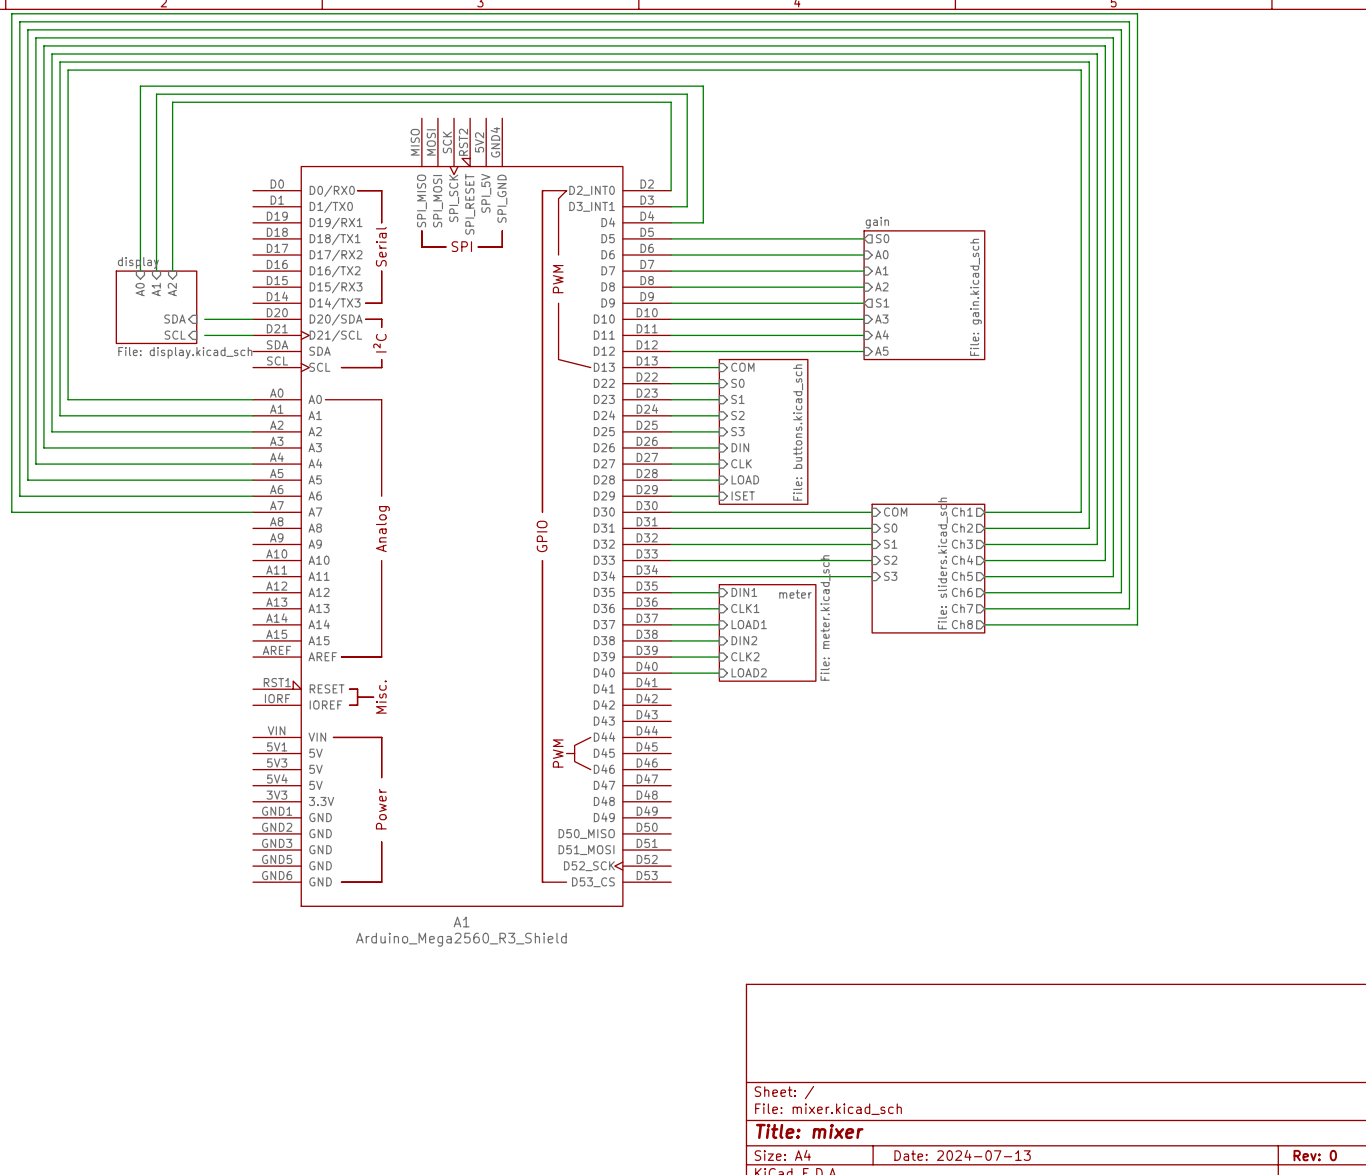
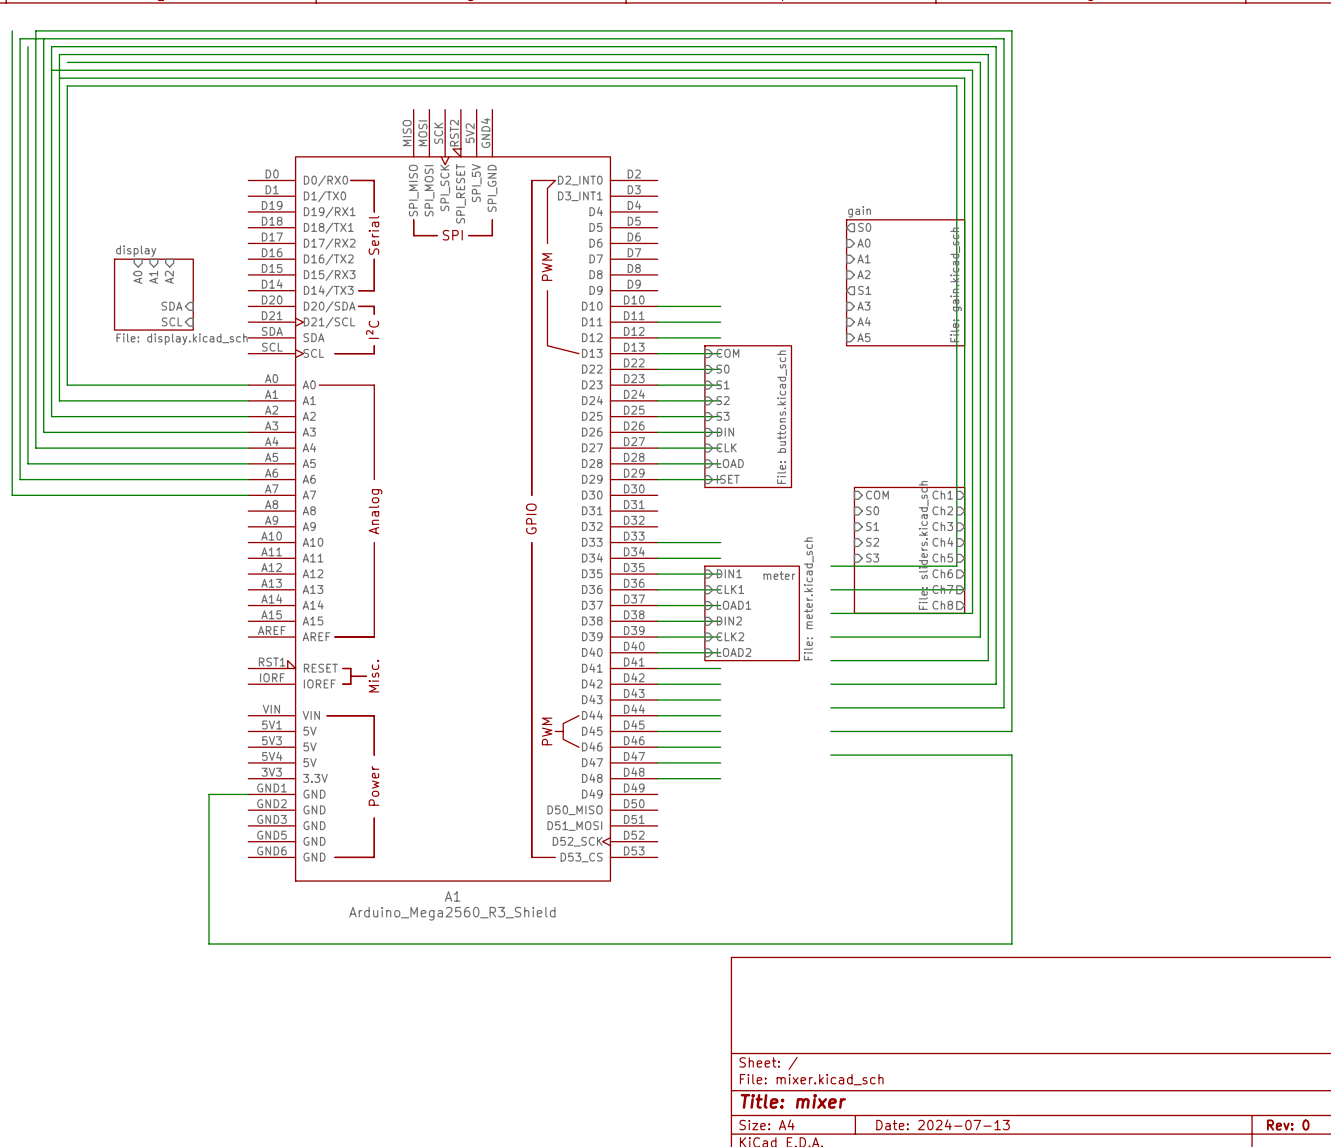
wire: (11, 37) (11, 13) (1137, 13) (1137, 624) (984, 624) -> none
wire: (1032, 37) (1113, 37) (1113, 576) (984, 576) -> (1011, 30) (1011, 731) (830, 731)
wire: (19, 45) (19, 21) (1129, 21) (1129, 608) (984, 608) -> (20, 38) (43, 38)
wire: (1024, 45) (1105, 45) (1105, 560) (984, 560) -> (1004, 38) (1004, 707) (830, 707)
wire: (27, 53) (27, 29) (1121, 29) (1121, 592) (984, 592) -> none
wire: (1016, 53) (1097, 53) (1097, 544) (984, 544) -> (996, 46) (996, 684) (830, 684)
wire: (1008, 62) (1089, 62) (1089, 528) (984, 528) -> (988, 54) (988, 660) (830, 660)
wire: (68, 70) (68, 94) -> (153, 86) (67, 86)
wire: (1000, 70) (1081, 70) (1081, 512) (984, 512) -> (980, 62) (980, 637) (830, 637)
wire: none -> (51, 70) (972, 70) (972, 613) (830, 613)
wire: (140, 86) (140, 271) -> (138, 78) (59, 78)
wire: (703, 86) (703, 222) (671, 222) -> (689, 78) (964, 78) (964, 589) (830, 589)
wire: (156, 94) (156, 271) -> none
wire: (687, 94) (687, 206) (671, 206) -> (673, 86) (956, 86) (956, 566) (830, 566)
wire: (671, 190) (671, 102) (172, 102) (172, 271) -> none
wire: (671, 238) (864, 238) -> none
wire: (671, 255) (864, 255) -> none
wire: (671, 271) (864, 271) -> none
wire: (671, 287) (864, 287) -> none
wire: (671, 303) (864, 303) -> none
wire: (204, 319) (253, 319) -> none
wire: (735, 319) (864, 319) -> none
wire: (204, 335) (253, 335) -> none
wire: (735, 335) (864, 335) -> none
wire: (735, 351) (864, 351) -> none
wire: none -> (704, 353) (720, 353)
wire: none -> (704, 369) (720, 369)
wire: none -> (704, 385) (720, 385)
wire: none -> (704, 400) (720, 400)
wire: none -> (704, 416) (720, 416)
wire: none -> (704, 432) (720, 432)
wire: none -> (704, 448) (720, 448)
wire: none -> (704, 463) (720, 463)
wire: none -> (704, 479) (720, 479)
wire: (671, 512) (872, 512) -> none
wire: (671, 528) (872, 528) -> none
wire: (671, 544) (872, 544) -> none
wire: (735, 560) (872, 560) -> none
wire: (735, 576) (872, 576) -> none
wire: none -> (704, 574) (720, 574)
wire: none -> (704, 589) (720, 589)
wire: none -> (704, 605) (720, 605)
wire: none -> (704, 621) (720, 621)
wire: none -> (704, 637) (720, 637)
wire: none -> (704, 652) (720, 652)
wire: none -> (657, 668) (720, 668)
wire: none -> (657, 684) (720, 684)
wire: none -> (657, 699) (720, 699)
wire: none -> (657, 715) (720, 715)
wire: none -> (657, 731) (720, 731)
wire: none -> (657, 747) (720, 747)
wire: none -> (830, 755) (1011, 755) (1011, 944) (209, 944) (209, 794) (248, 794)
wire: none -> (657, 762) (720, 762)
wire: none -> (657, 778) (720, 778)

